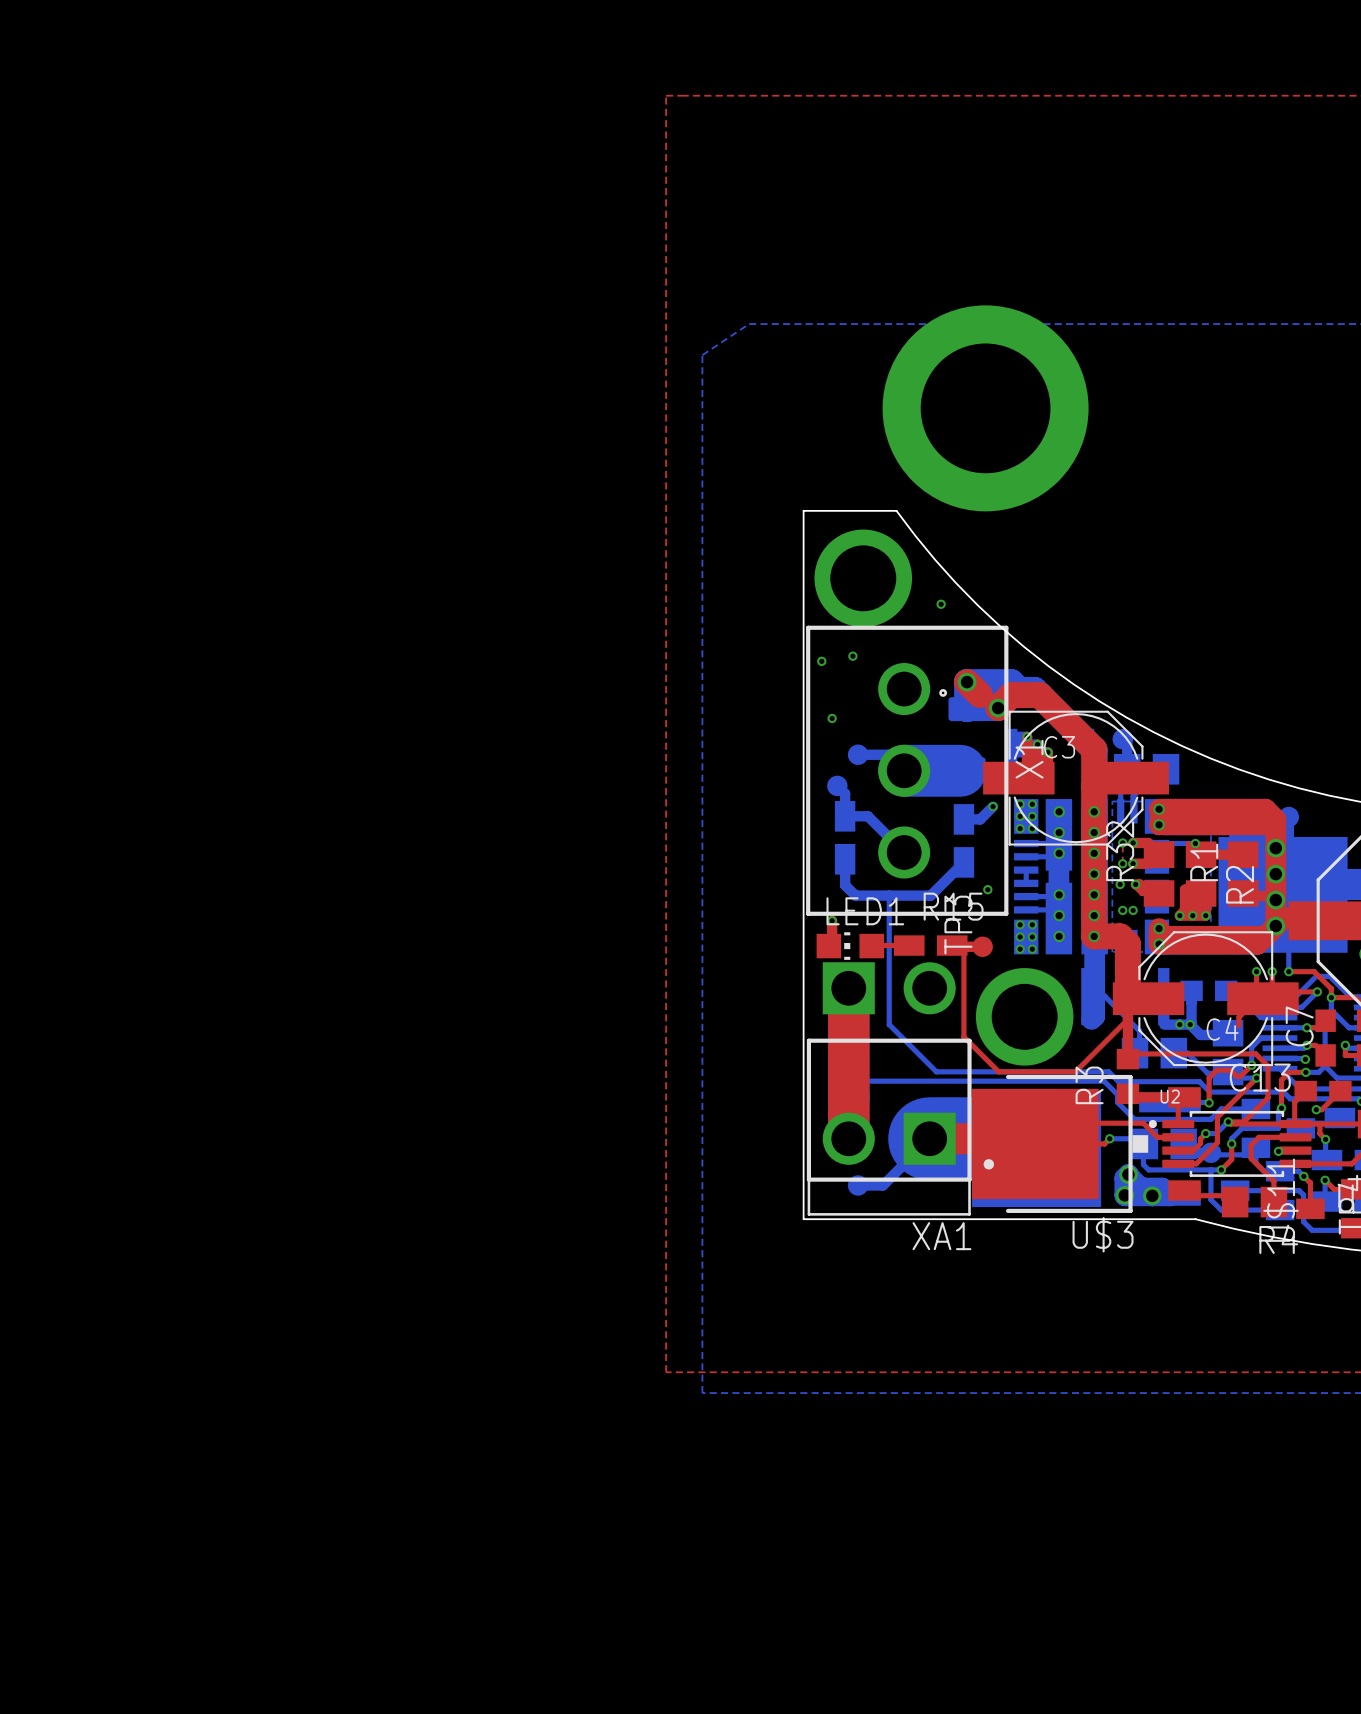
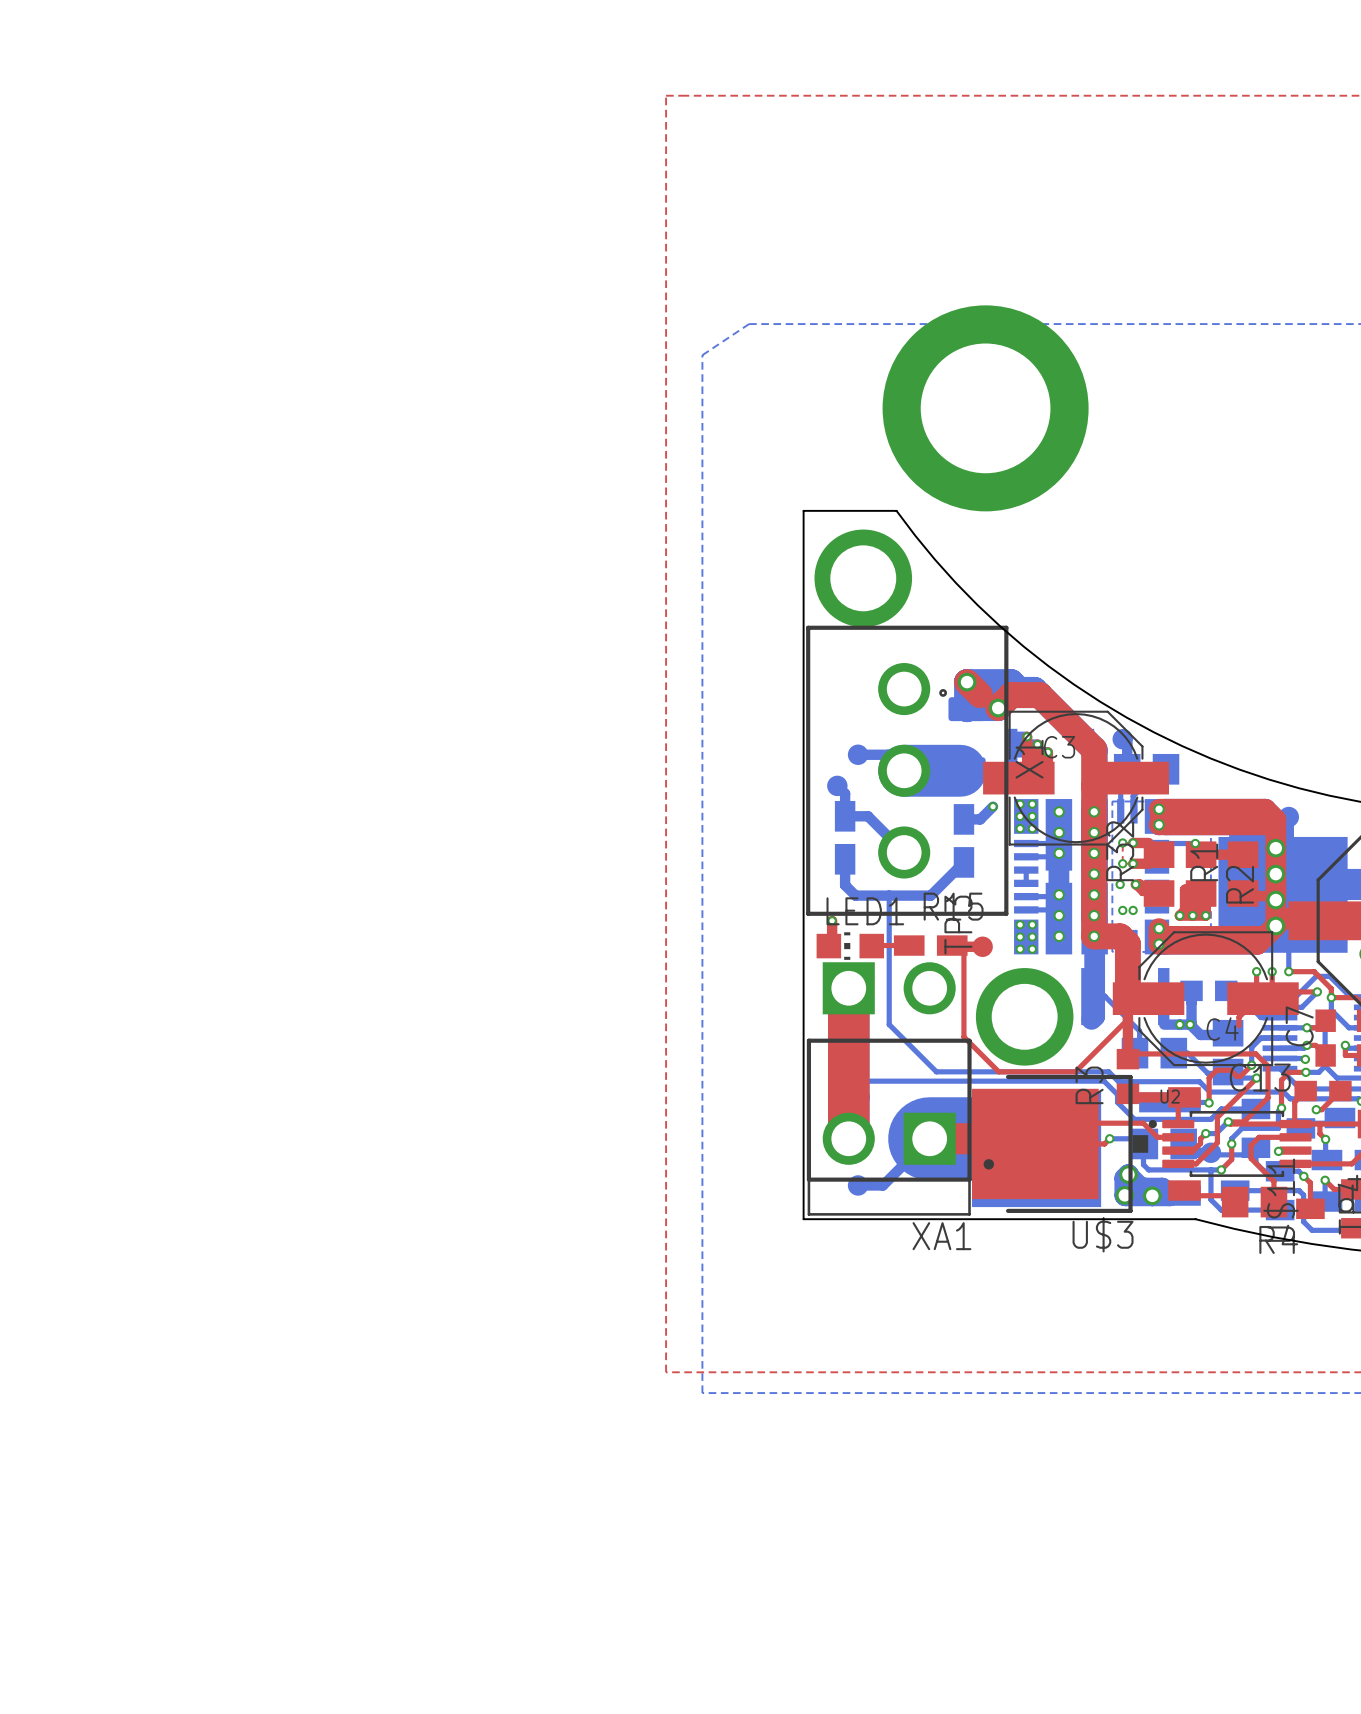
via: (941, 604) -> none
via: (852, 656) -> none
via: (821, 661) -> none
via: (832, 718) -> none
via: (987, 889) -> none

